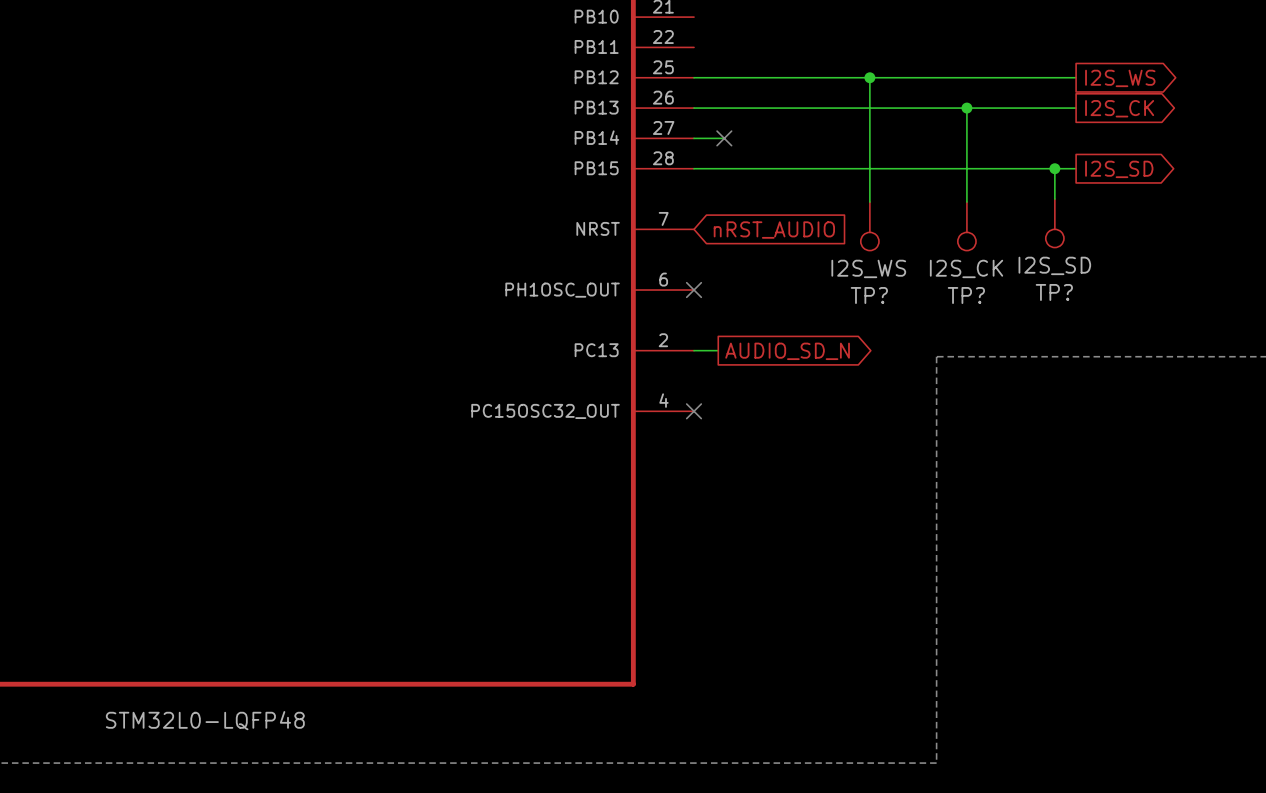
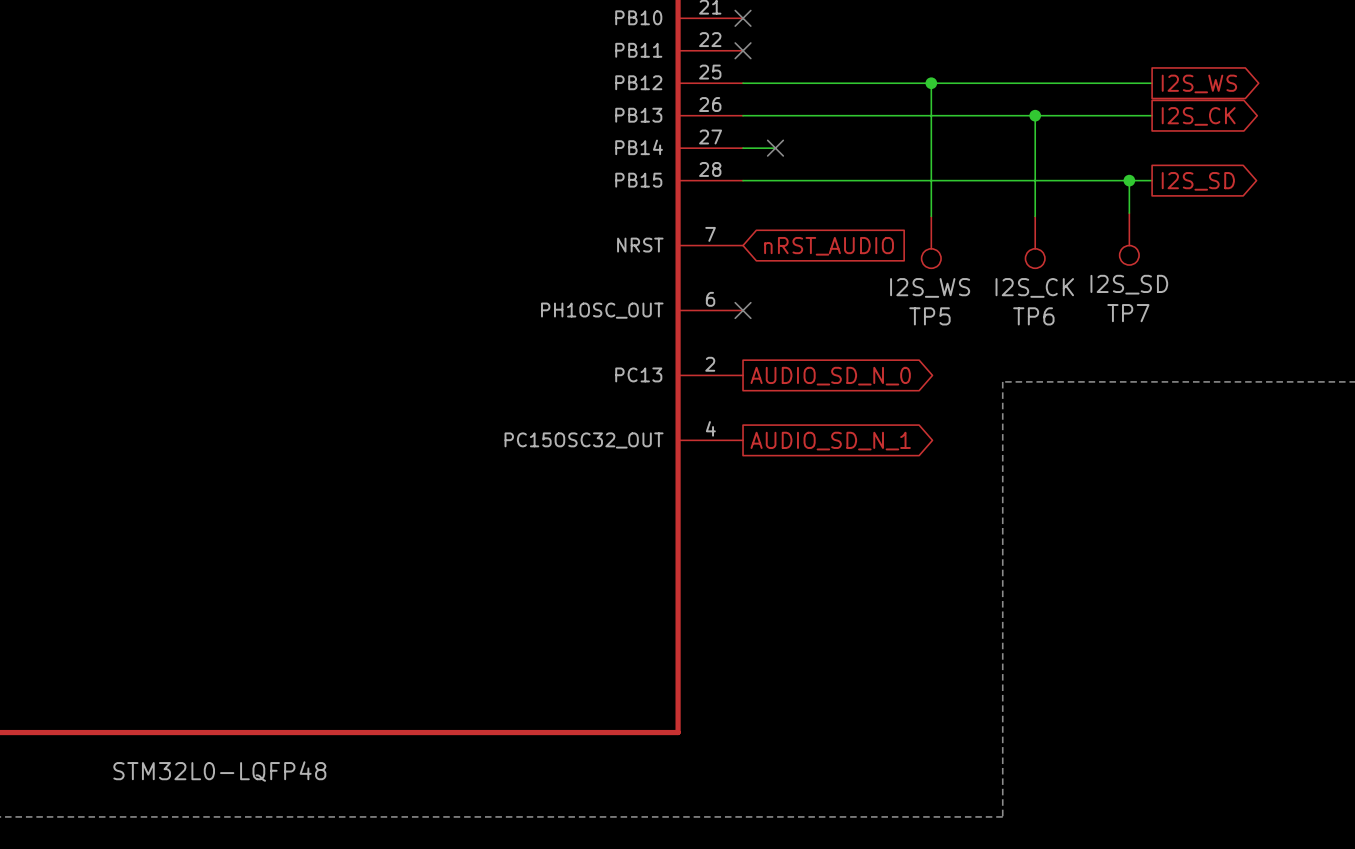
no-connect mark: none -> (743, 18)
no-connect mark: none -> (743, 50)
TP? name: TP? (1054, 292) -> TP7 (1128, 313)
TP? name: TP? (869, 295) -> TP5 (929, 316)
TP? name: TP? (966, 295) -> TP6 (1033, 316)
wire: (694, 350) (718, 350) -> none
global label: AUDIO_SD_N (787, 351) -> AUDIO_SD_N_0 (830, 376)
no-connect mark: (694, 411) -> none
global label: none -> AUDIO_SD_N_1 (830, 441)

